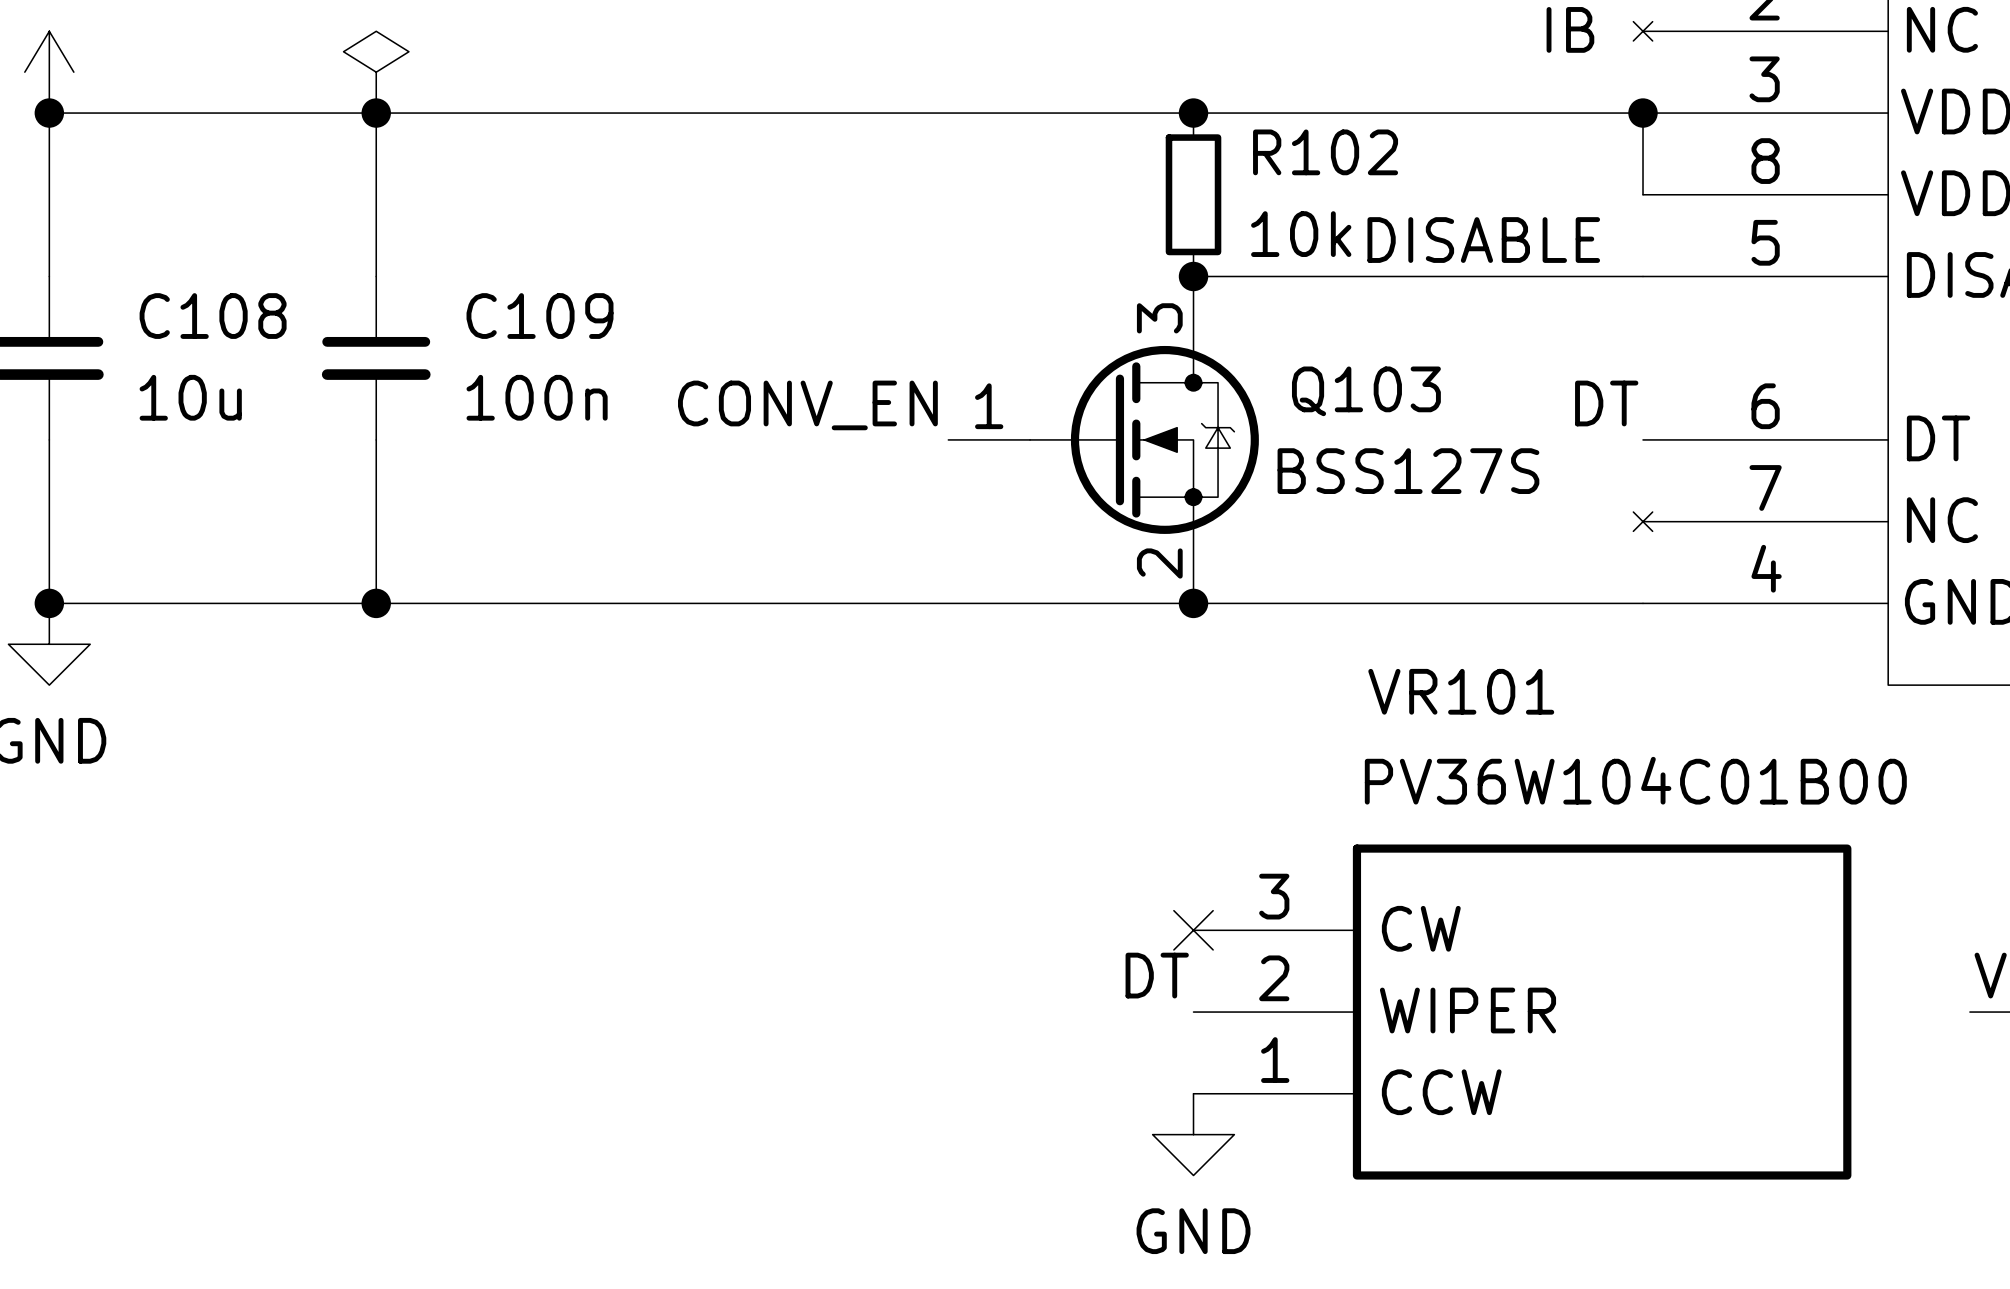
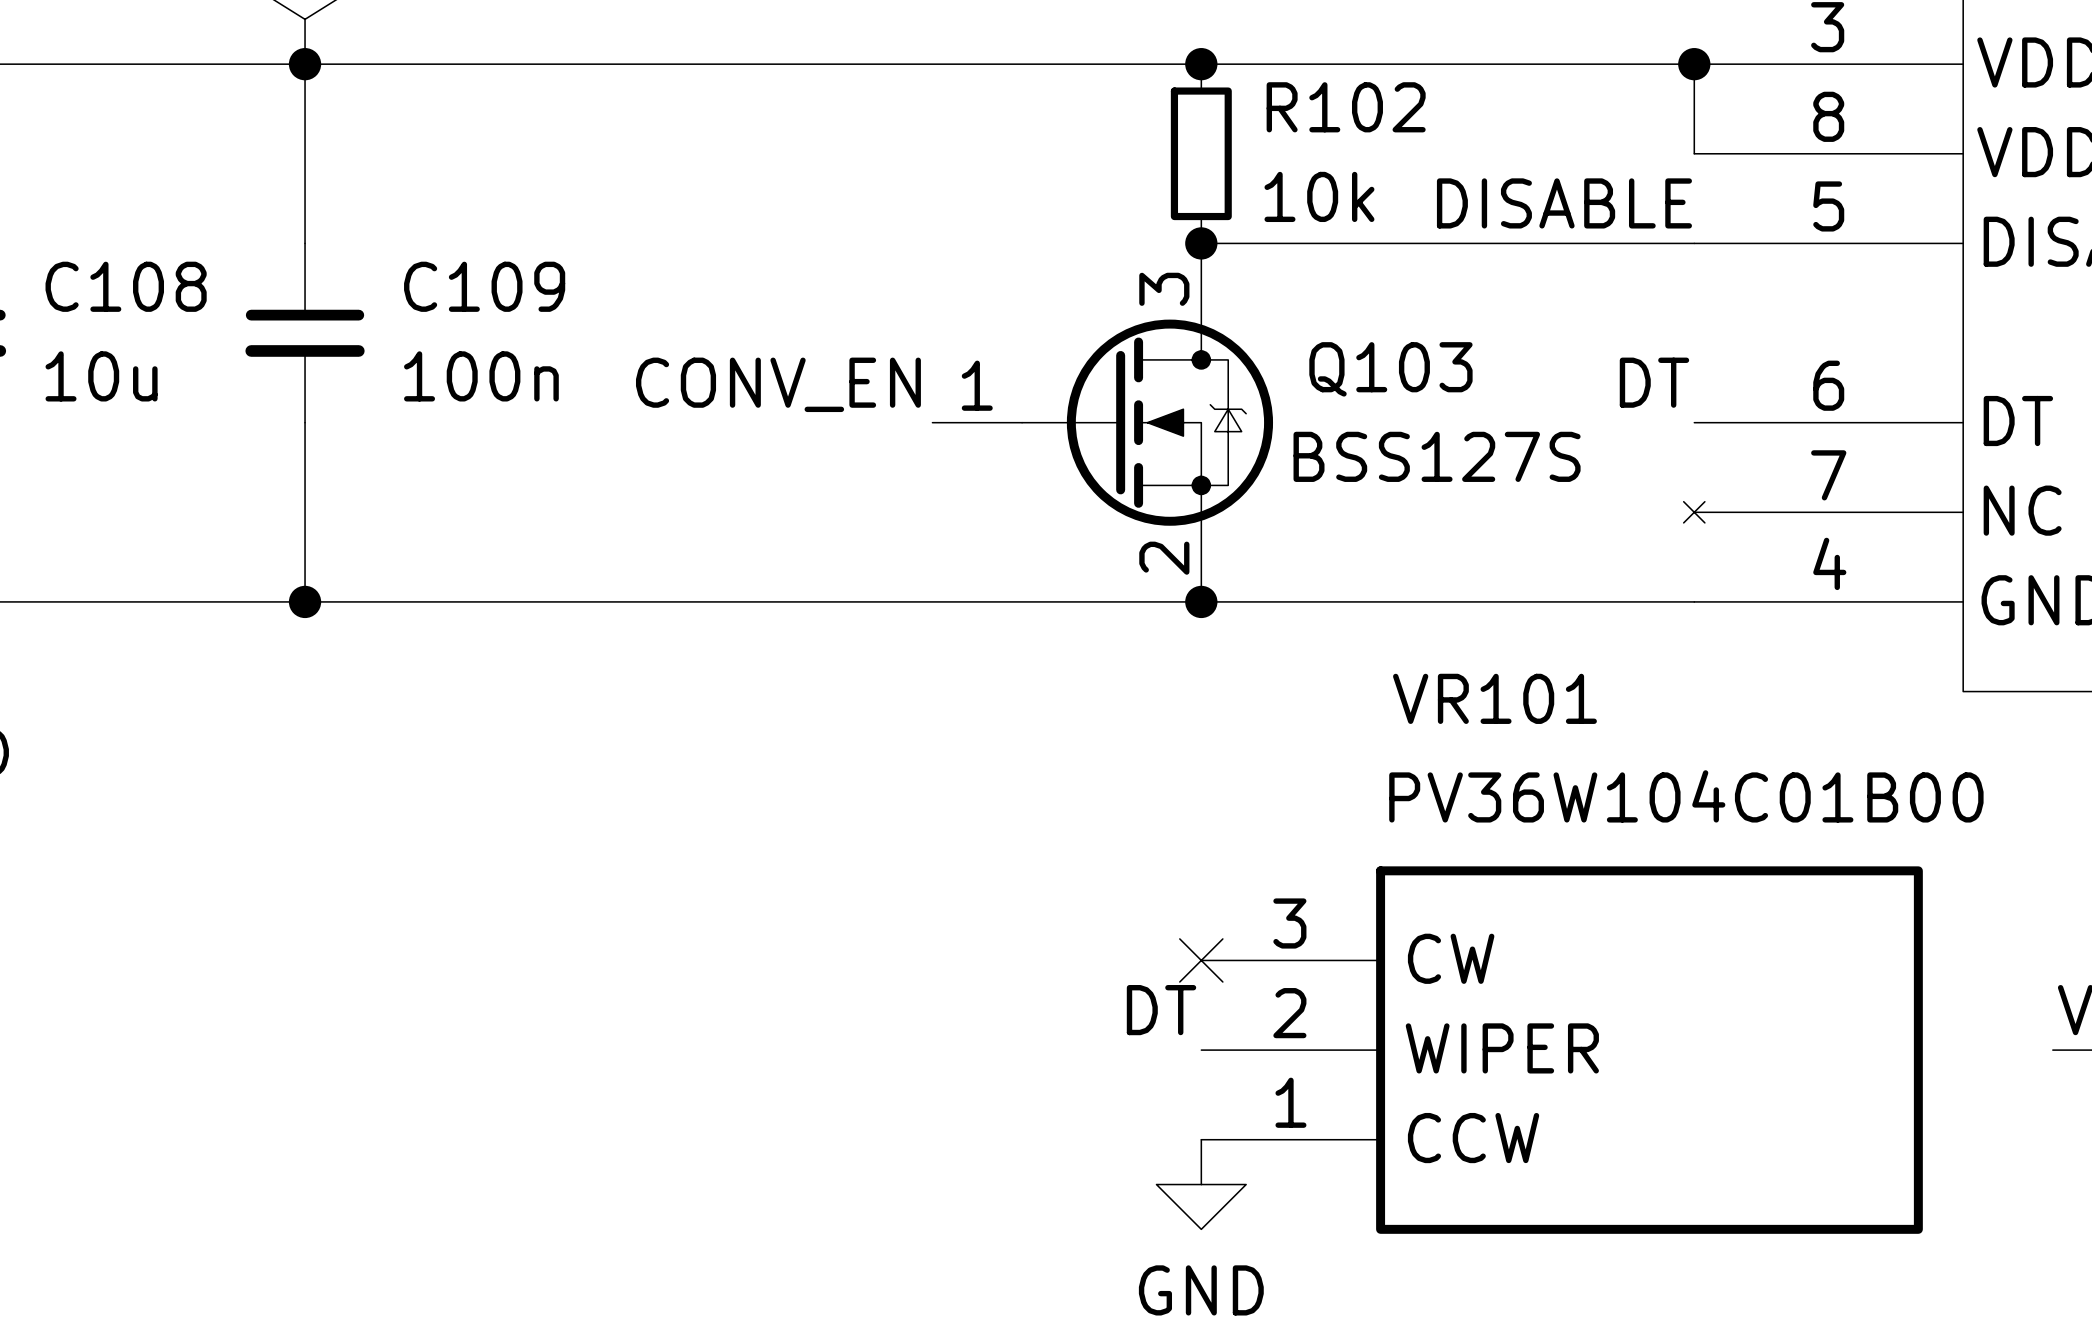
label position: DISABLE (1483, 240) -> DISABLE (1564, 203)

